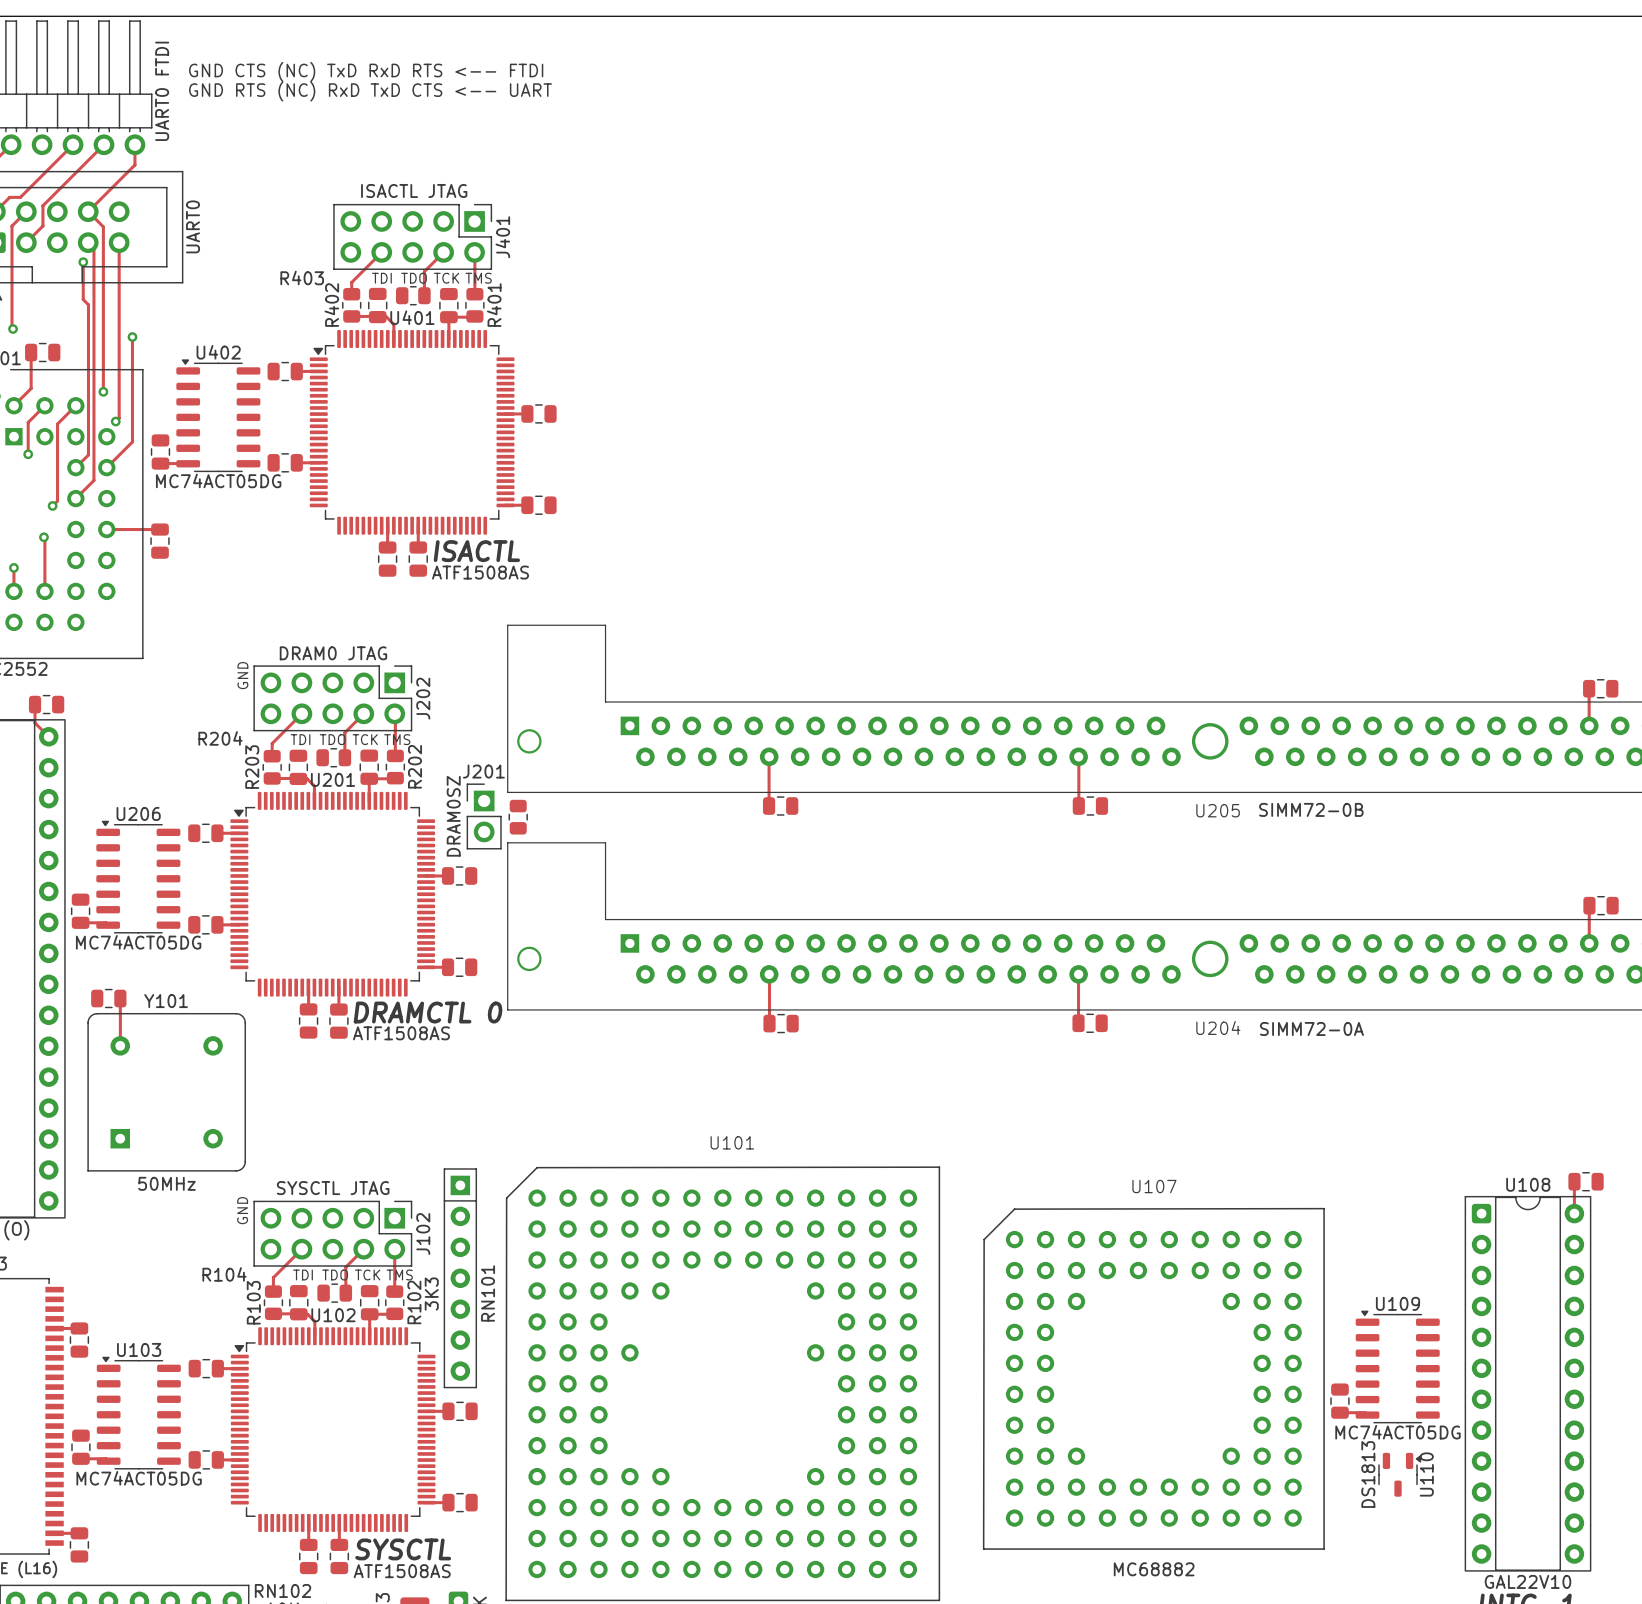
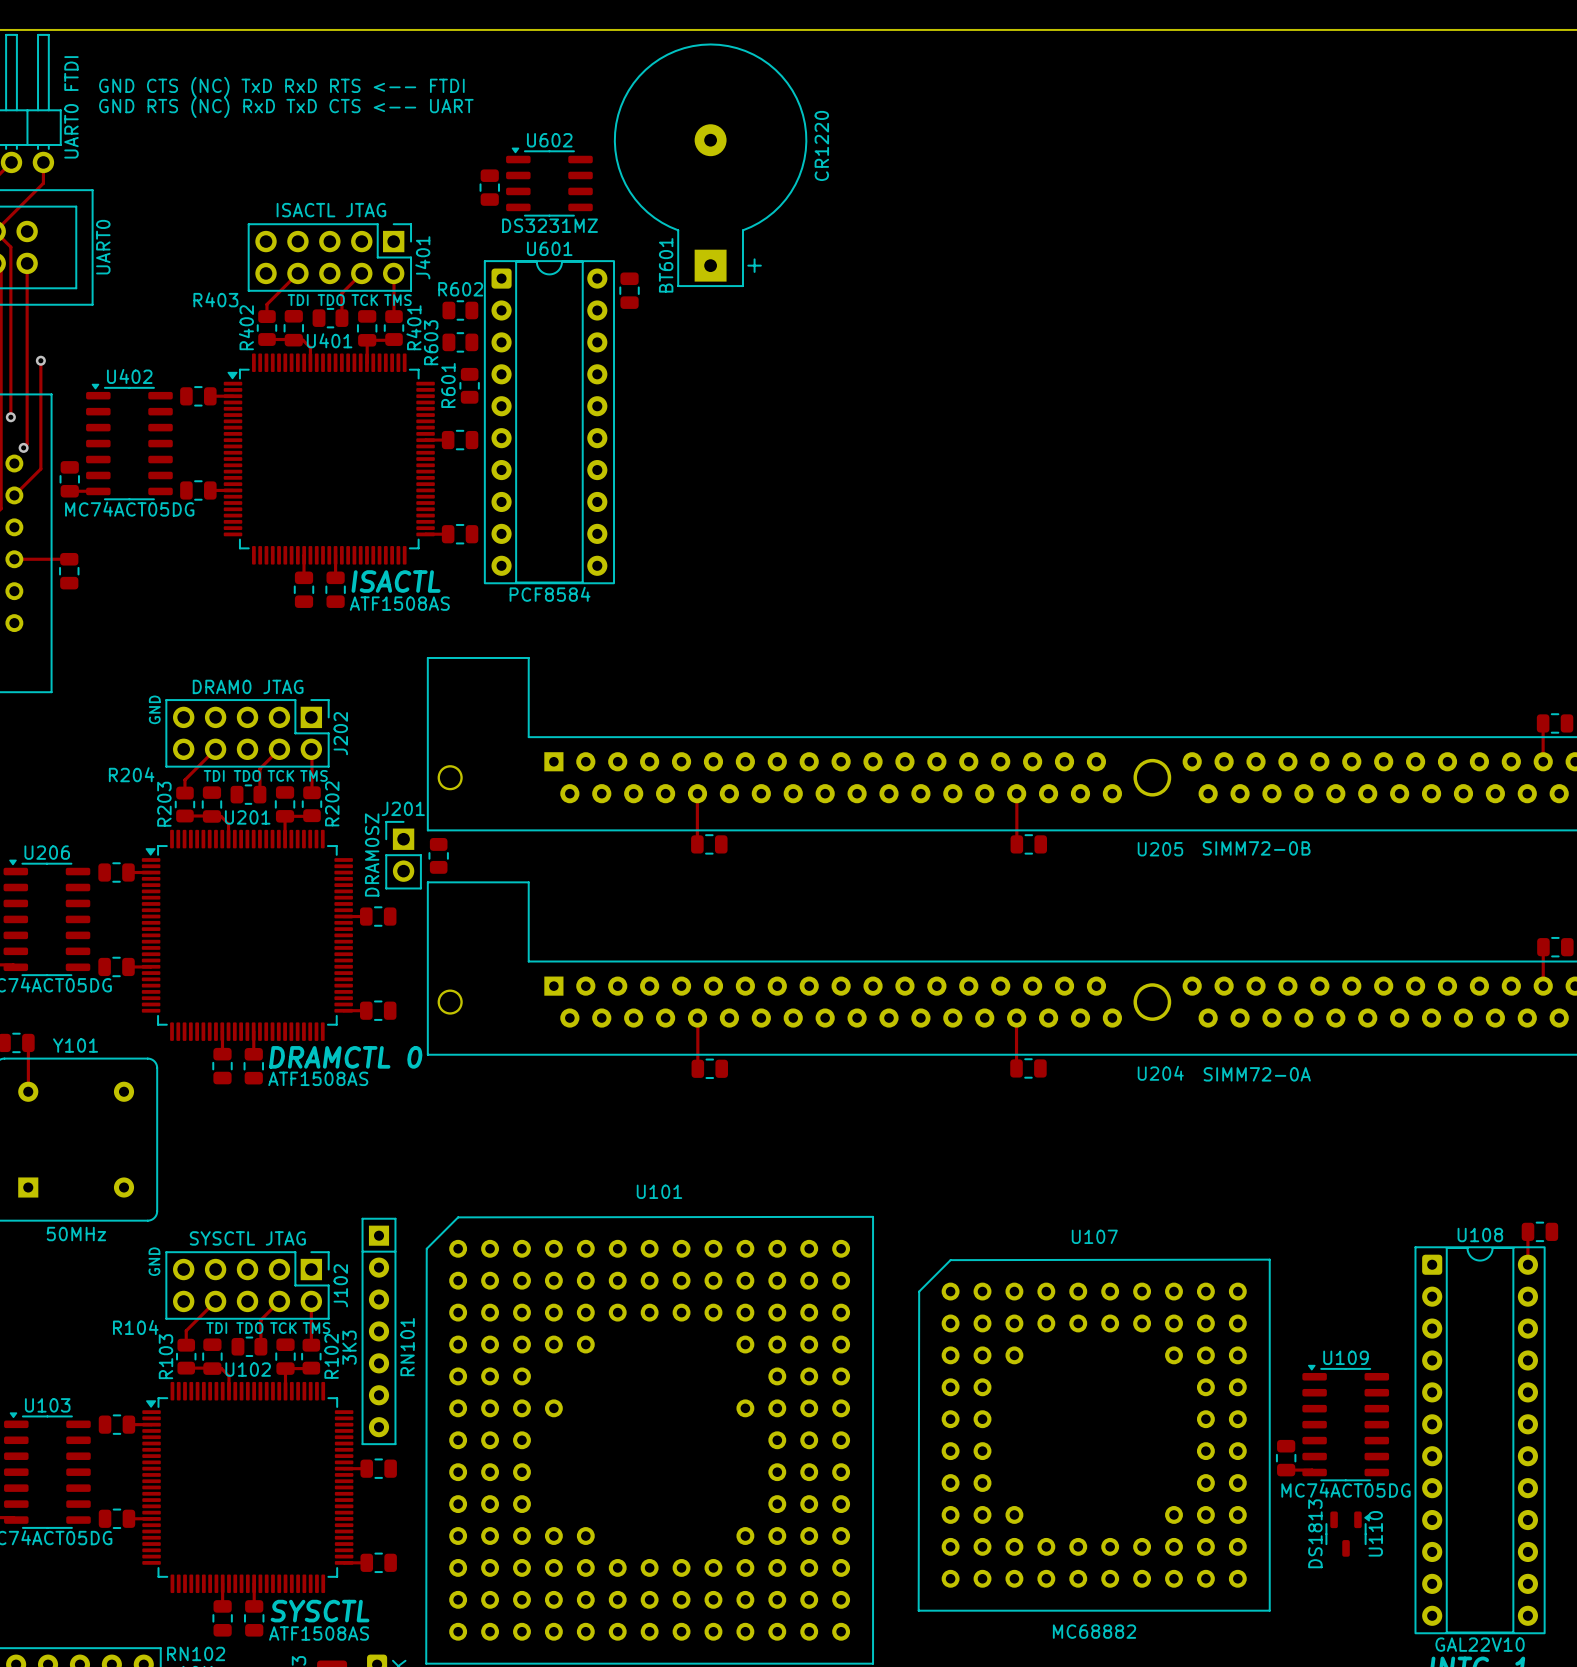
BT601: none -> CR1220 (710, 165)
U602: none -> DS3231MZ (549, 181)
part: none -> (489, 187)
part: none -> (629, 290)
R602: none -> (460, 310)
R603: none -> (460, 342)
R601: none -> (469, 385)
U601: none -> PCF8584 (549, 422)

